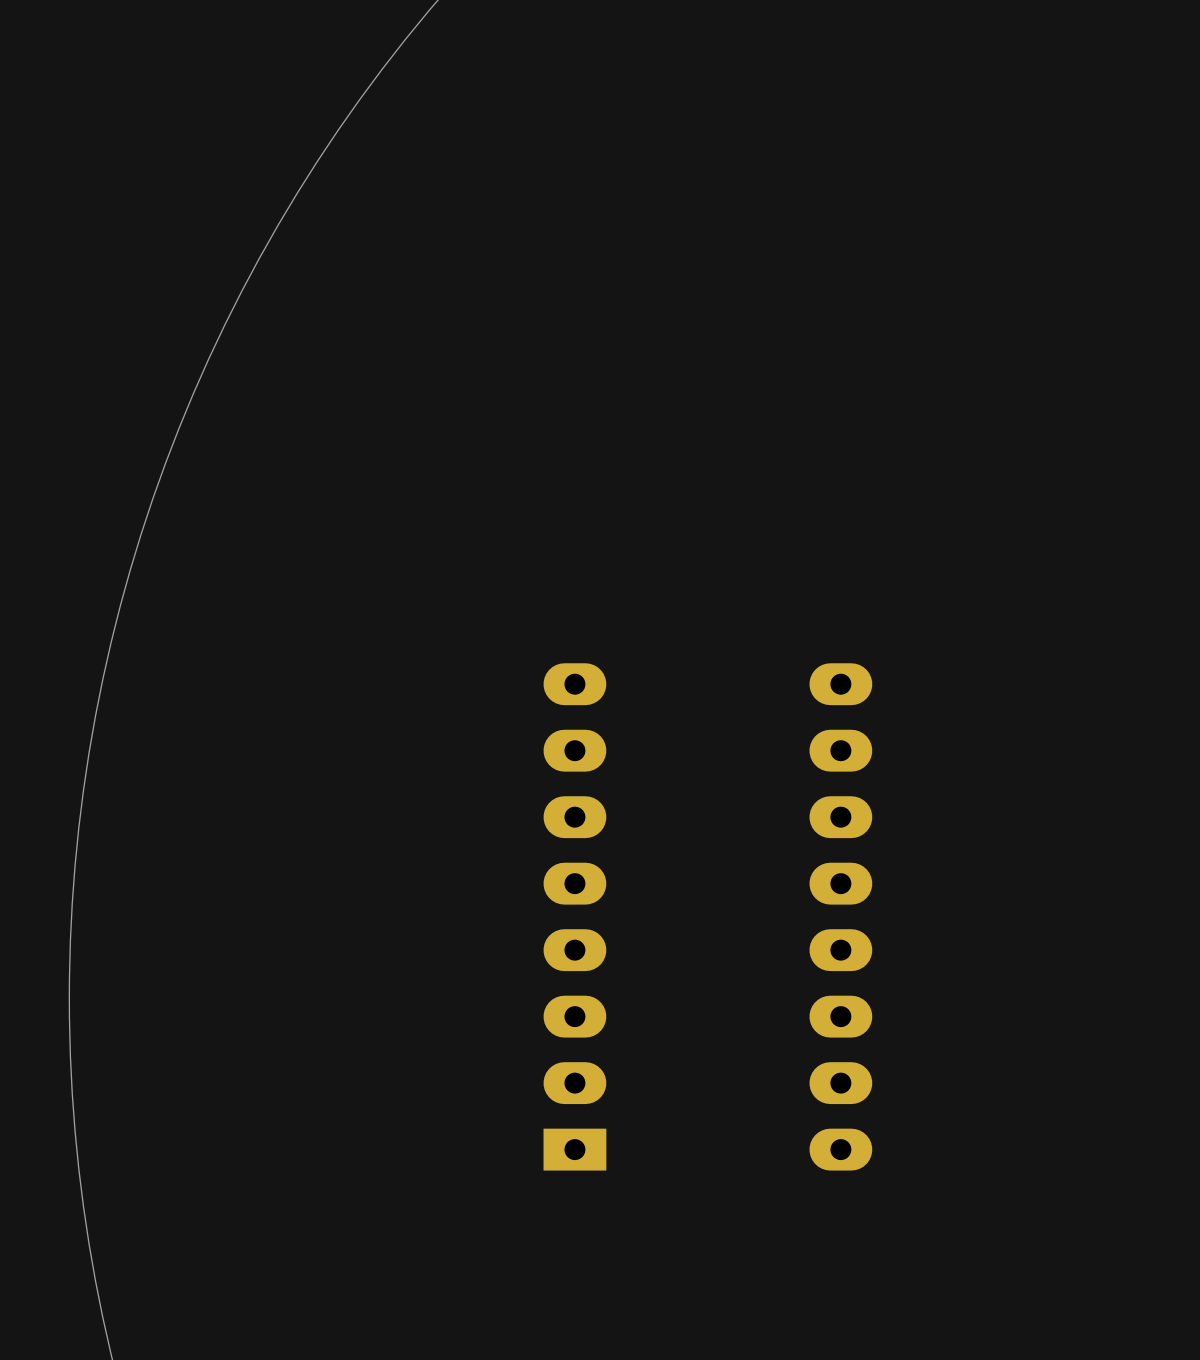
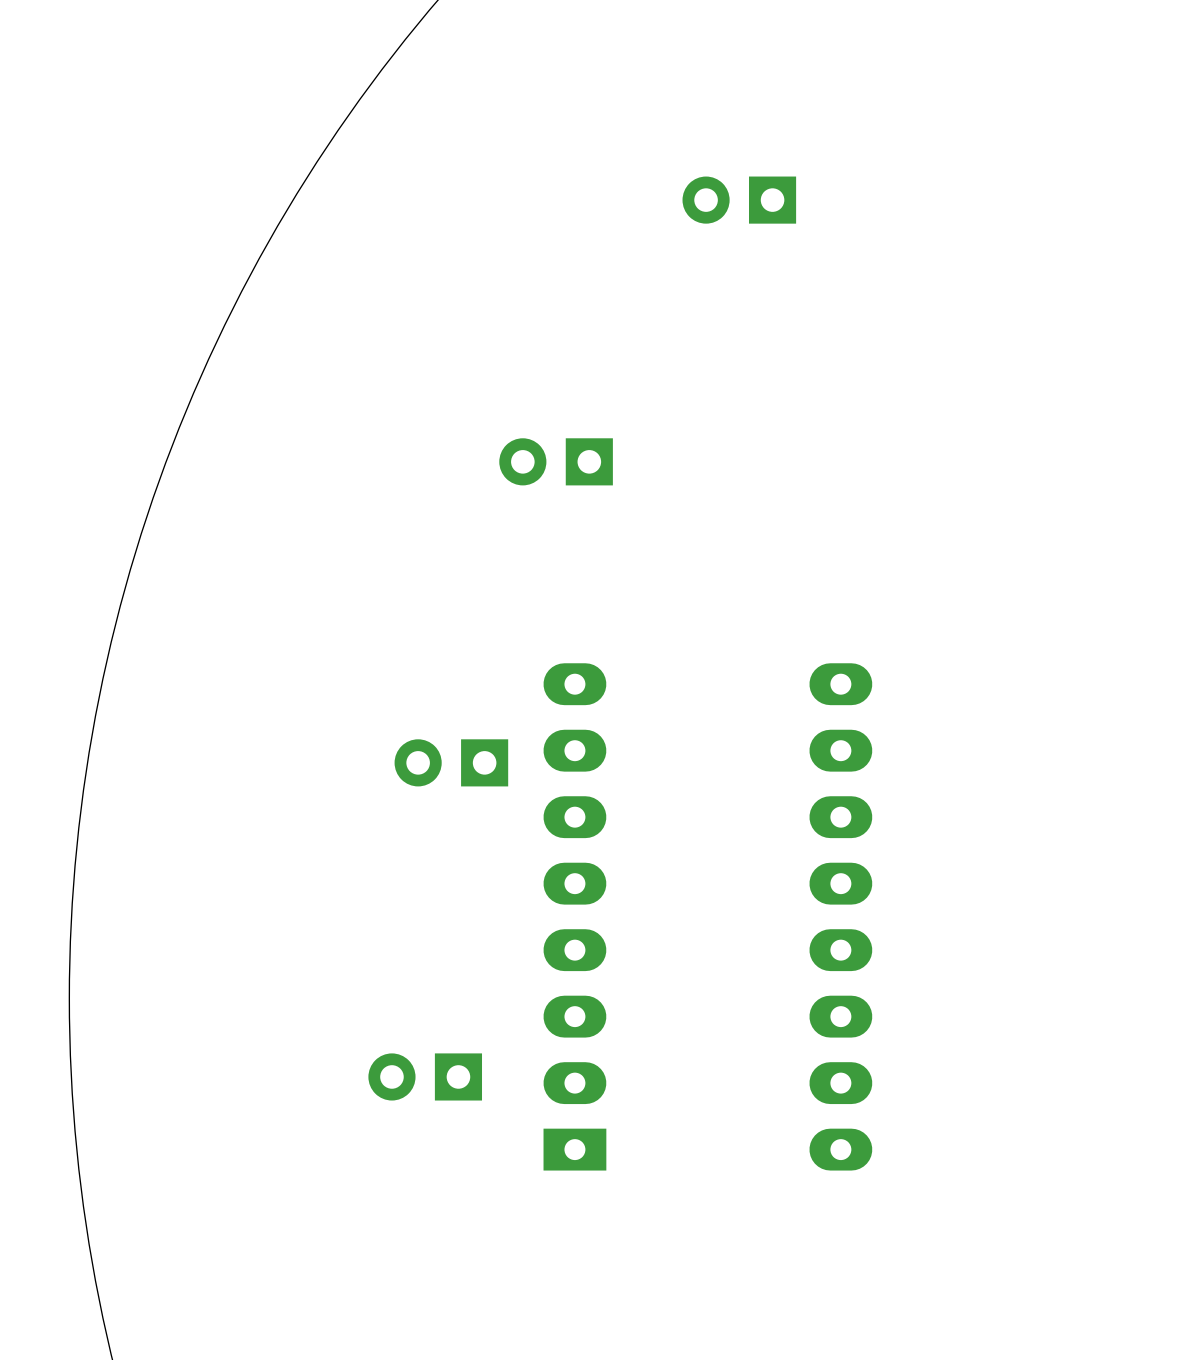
part: none -> (739, 200)
part: none -> (556, 461)
part: none -> (451, 762)
part: none -> (425, 1076)

